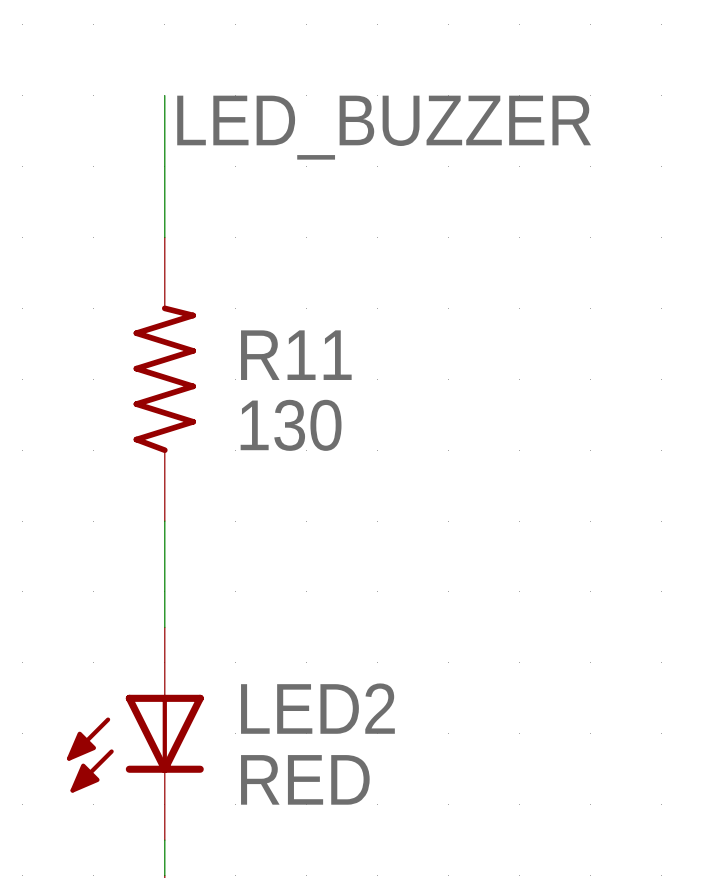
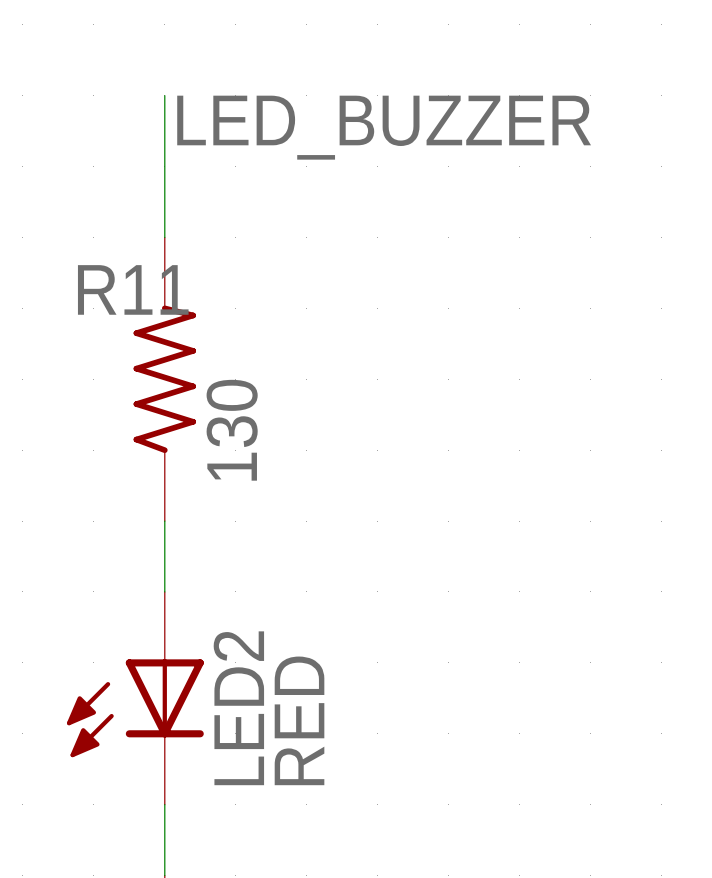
R11 name position: R11 (296, 355) -> R11 (133, 289)
R11 value rotation: 0° (291, 425) -> 90° counterclockwise (232, 430)
LED2 name rotation: 0° (317, 708) -> 90° counterclockwise (238, 708)
LED2 position: (135, 733) -> (135, 698)
LED2 value rotation: 0° (305, 779) -> 90° counterclockwise (299, 720)

